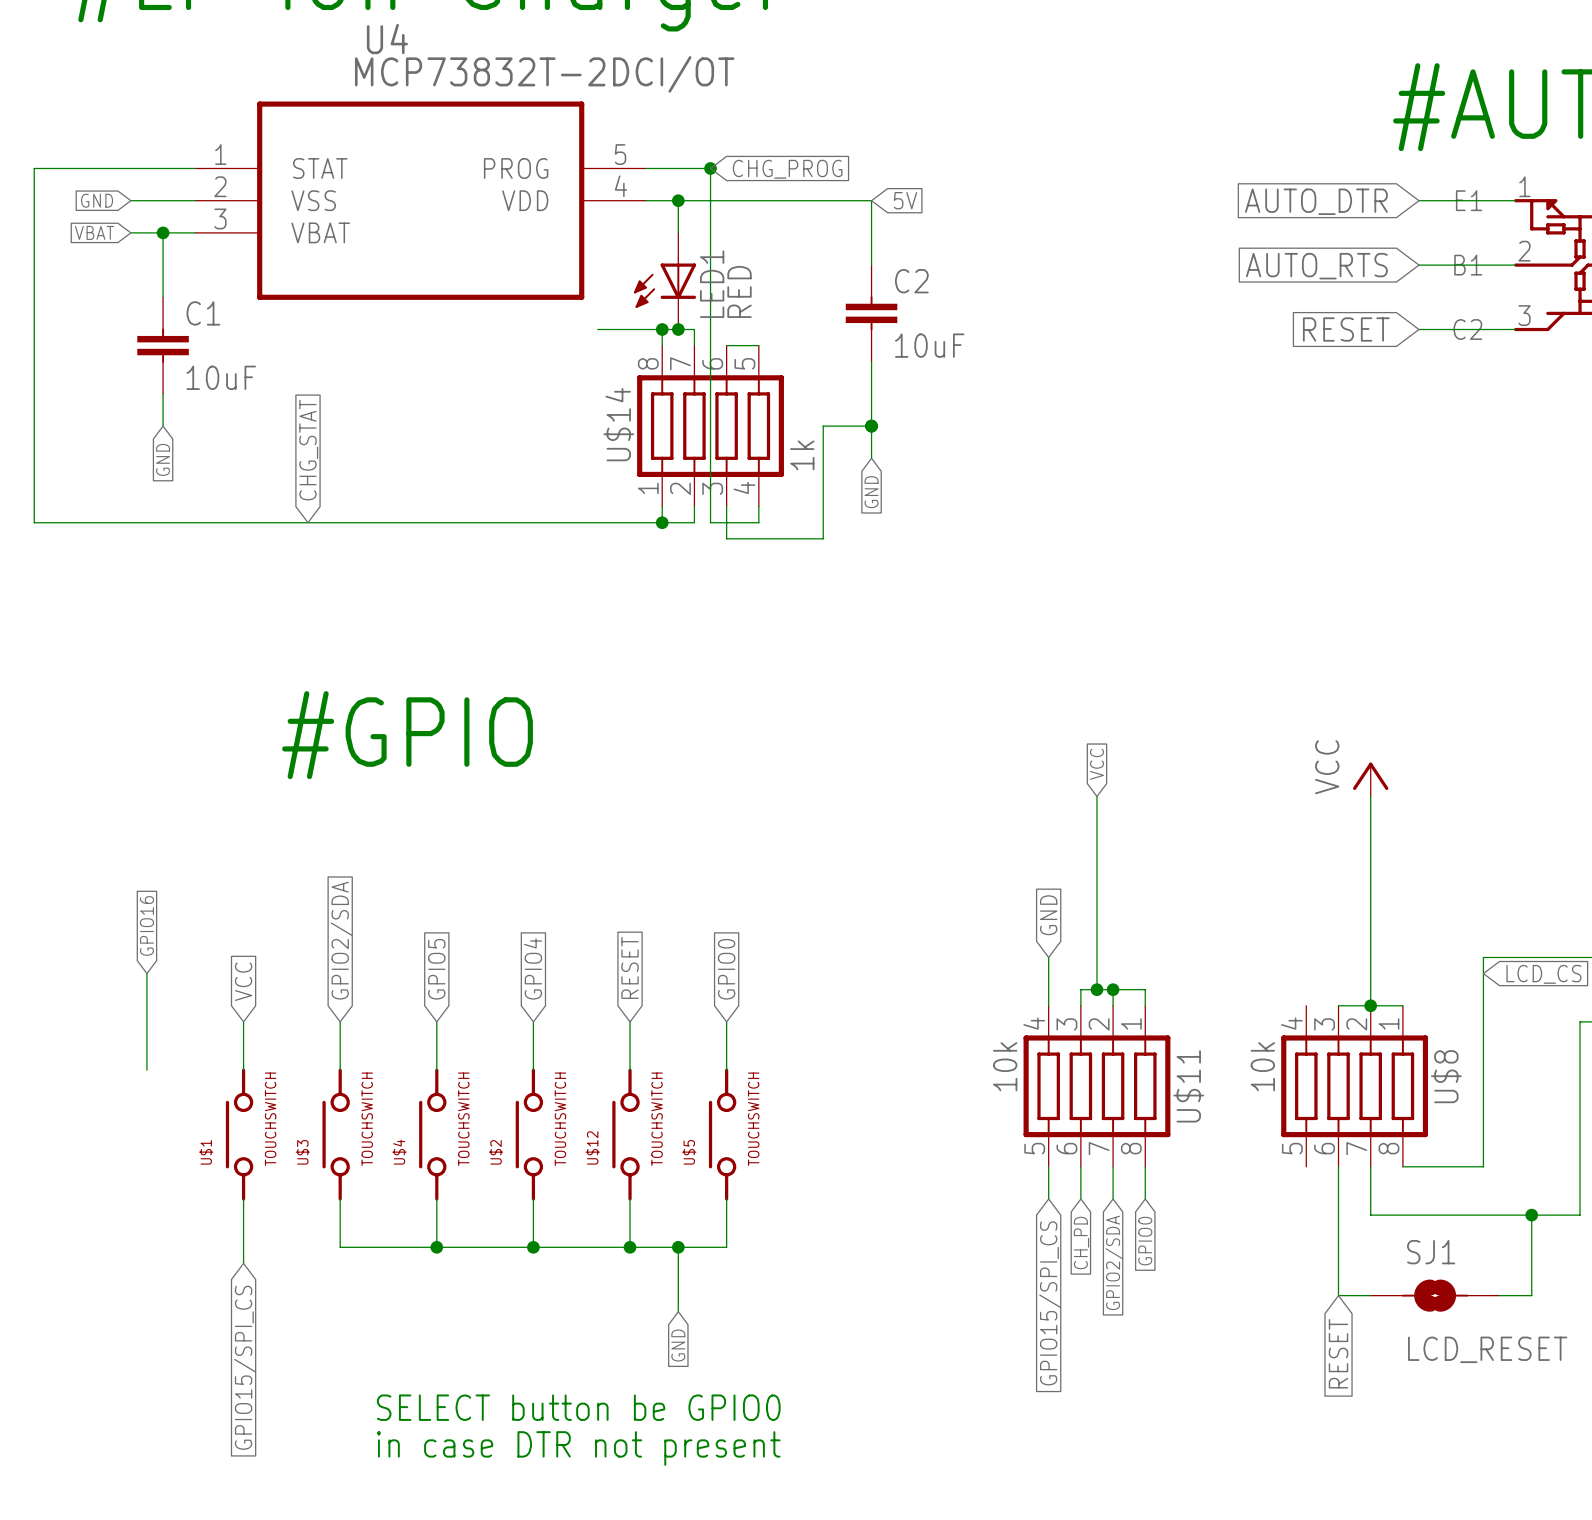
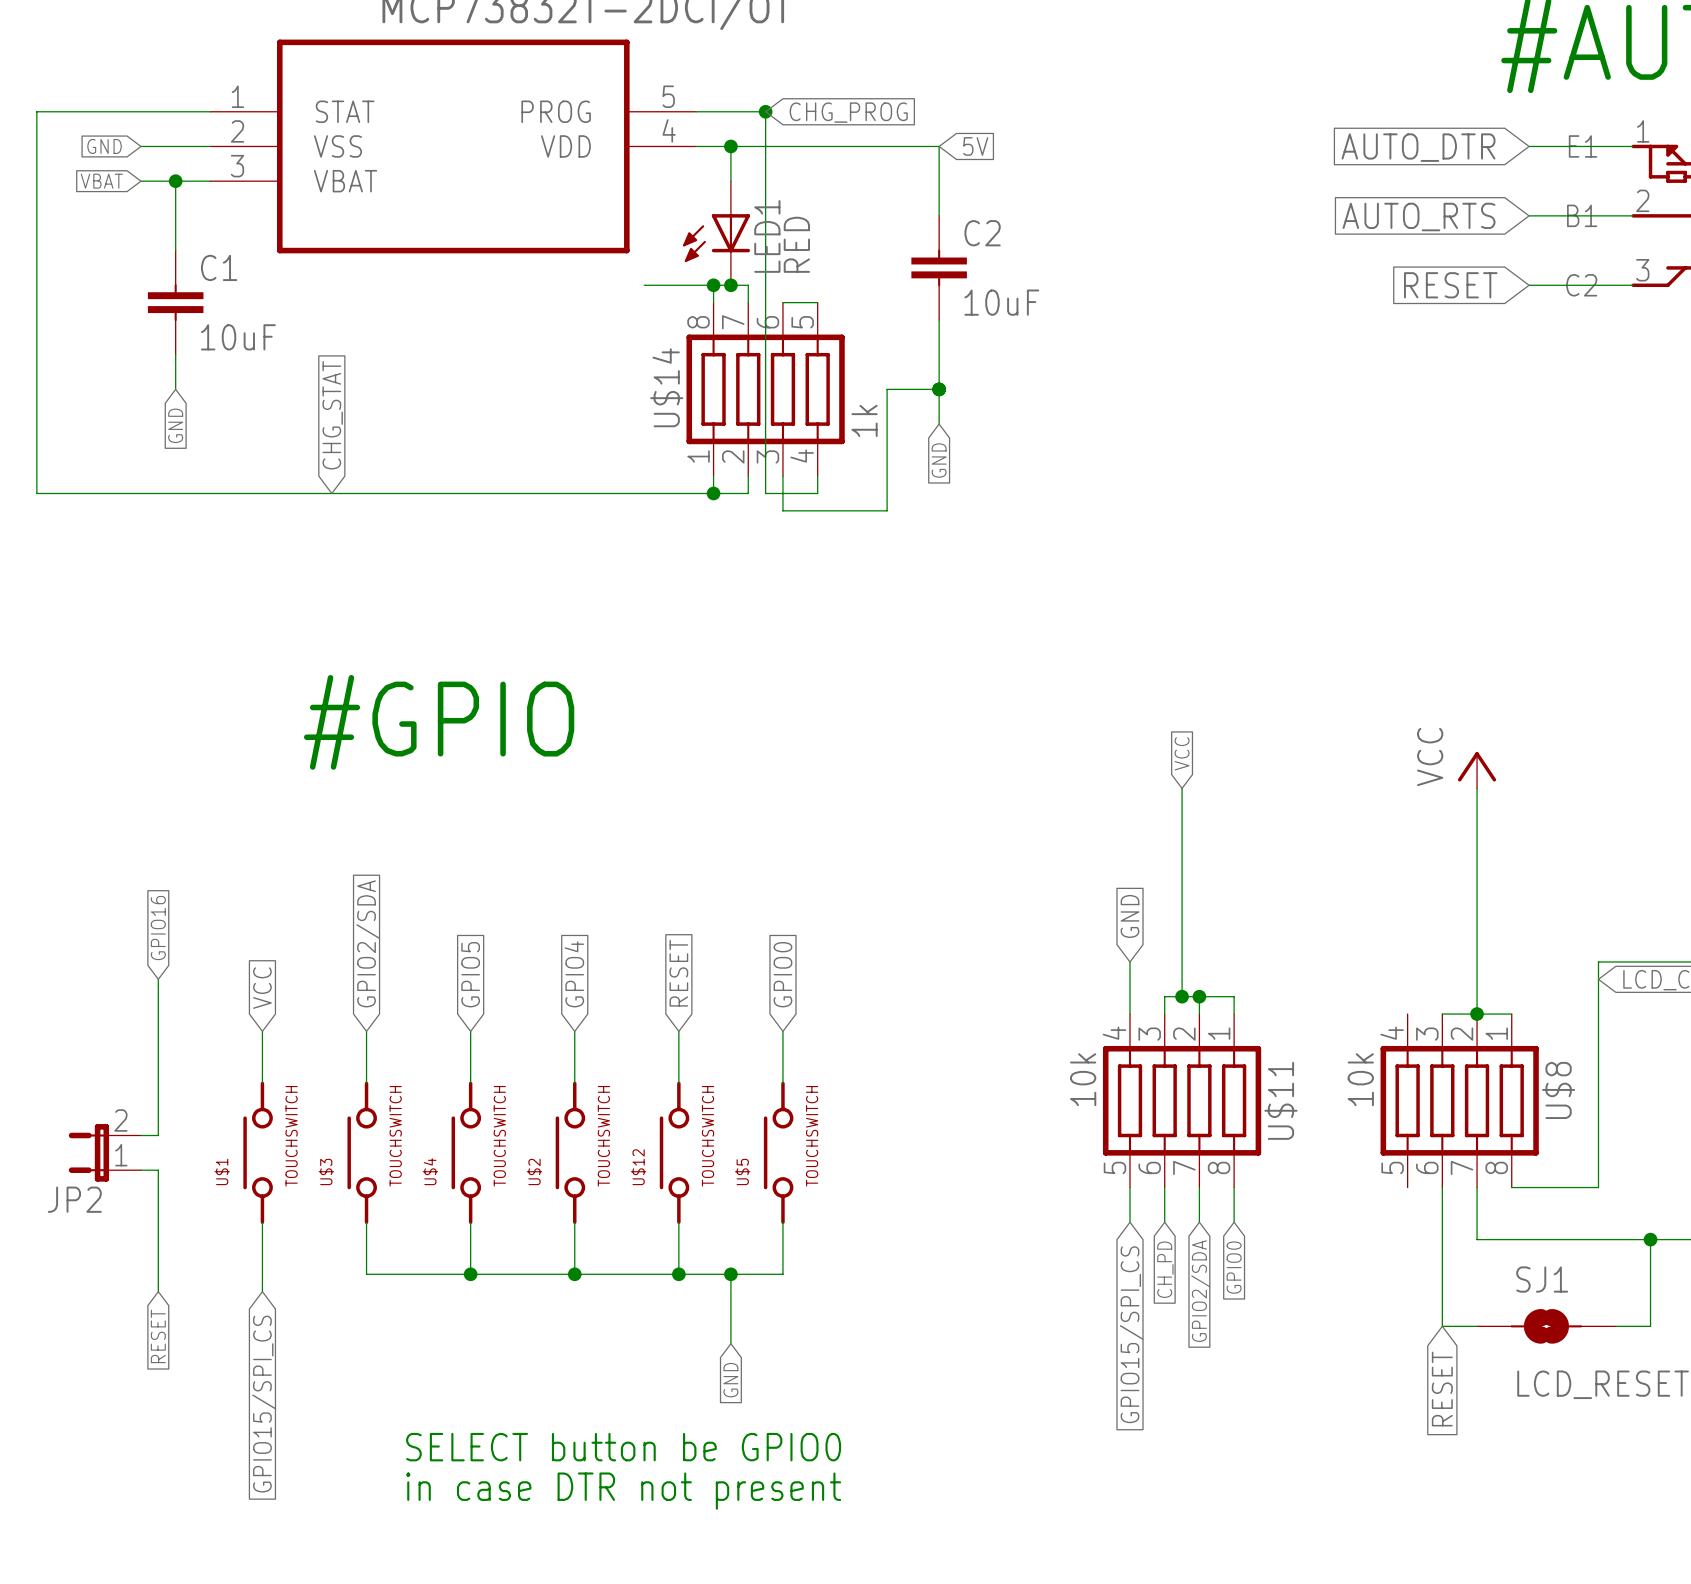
wire: none -> (158, 1083) (158, 1135) (140, 1135)
JP2: none -> (104, 1152)
wire: none -> (140, 1170) (158, 1170) (158, 1291)
global label: none -> RESET (158, 1336)

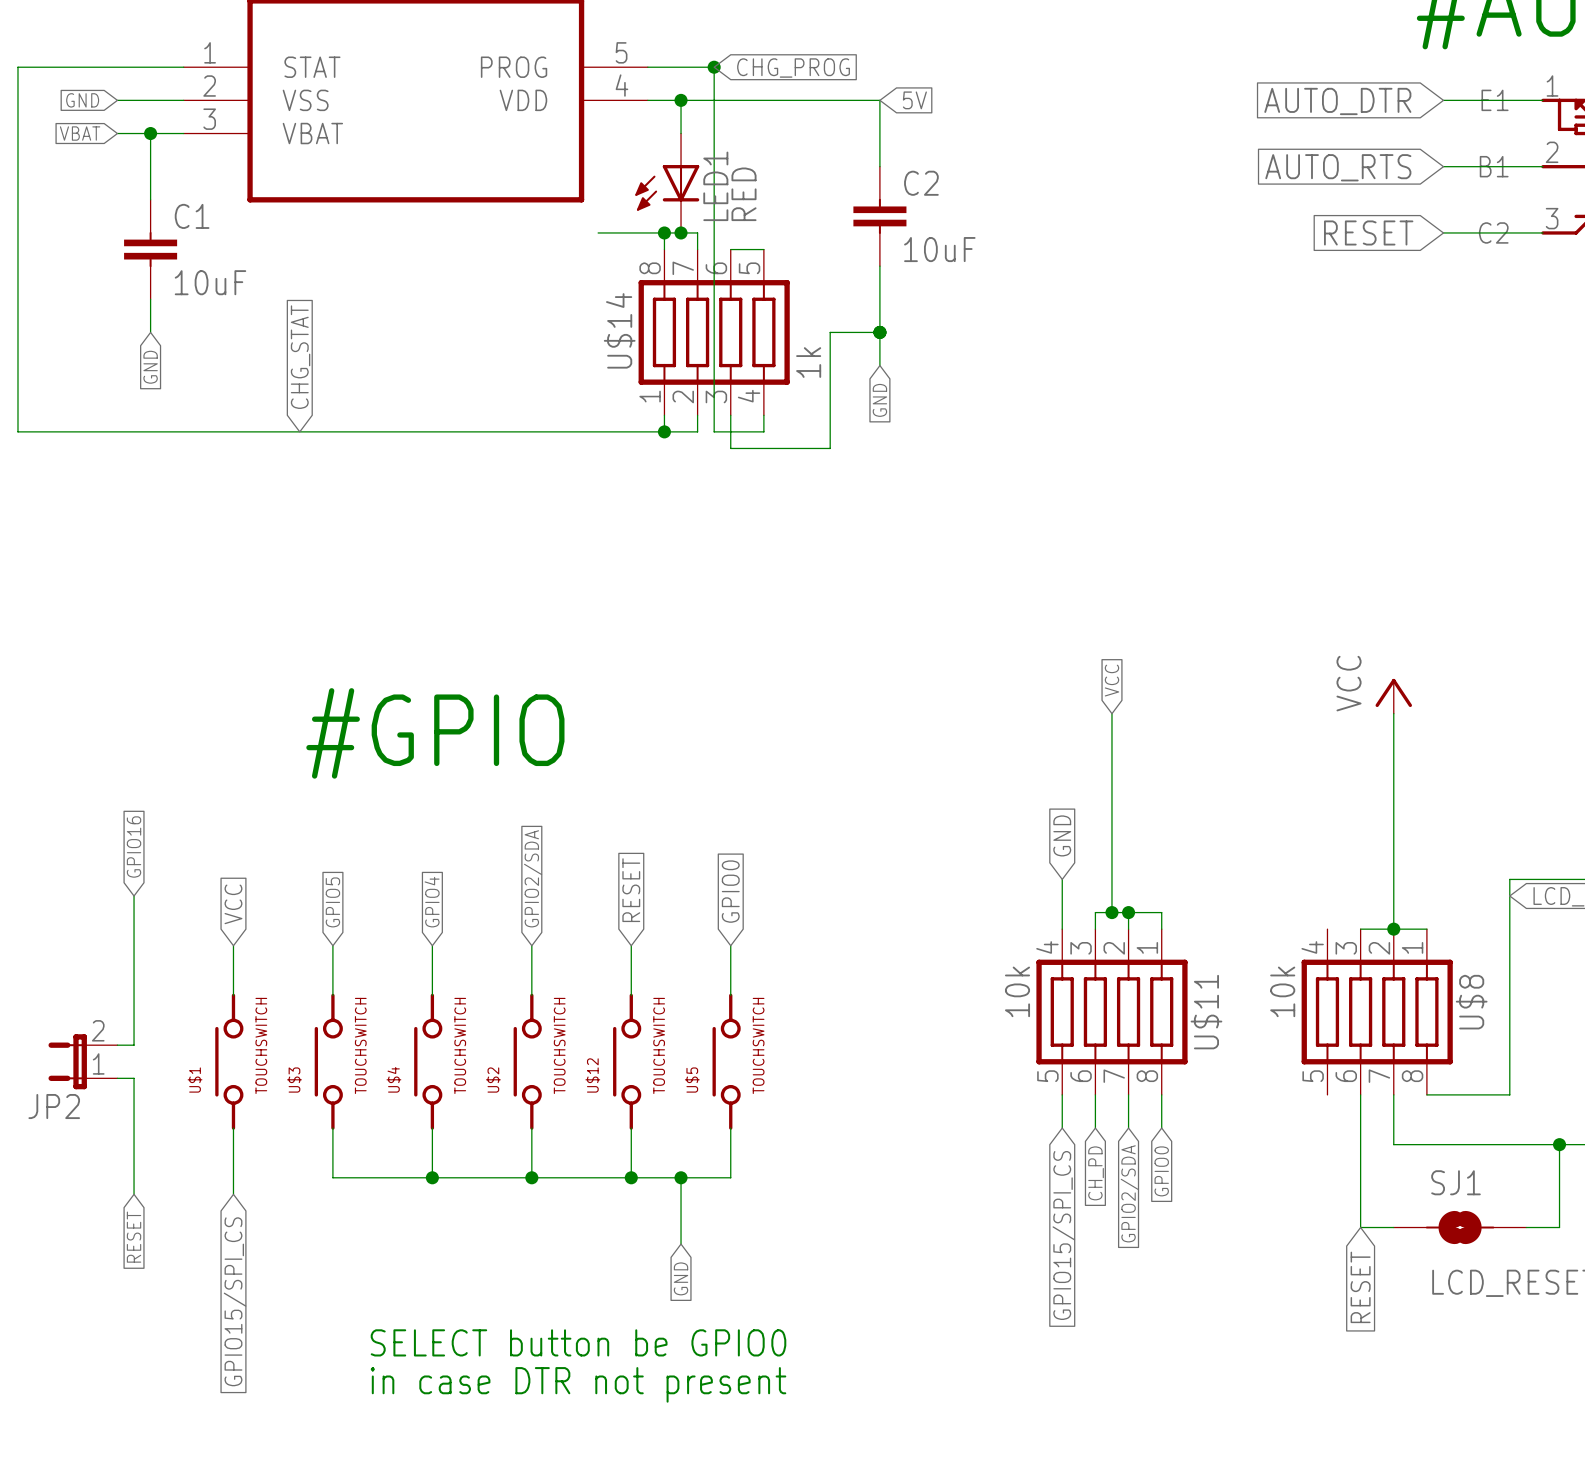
text position: #GPIO (439, 722) -> #GPIO (435, 733)
global label: GPIO2/SDA (368, 943) -> GPIO5 (332, 902)
global label: GPIO5 (470, 974) -> GPIO4 (432, 902)
global label: GPIO4 (574, 974) -> GPIO2/SDA (533, 878)

